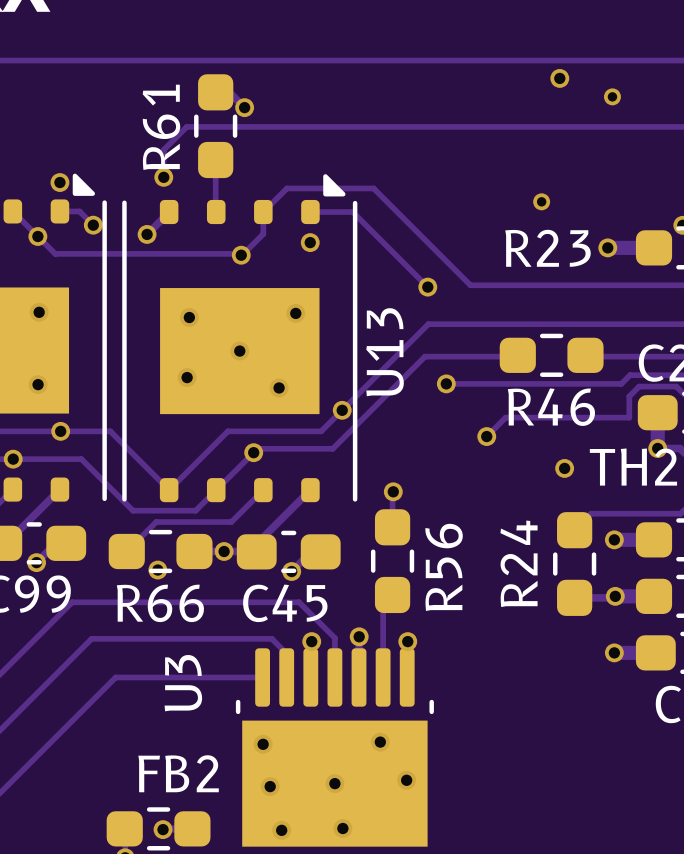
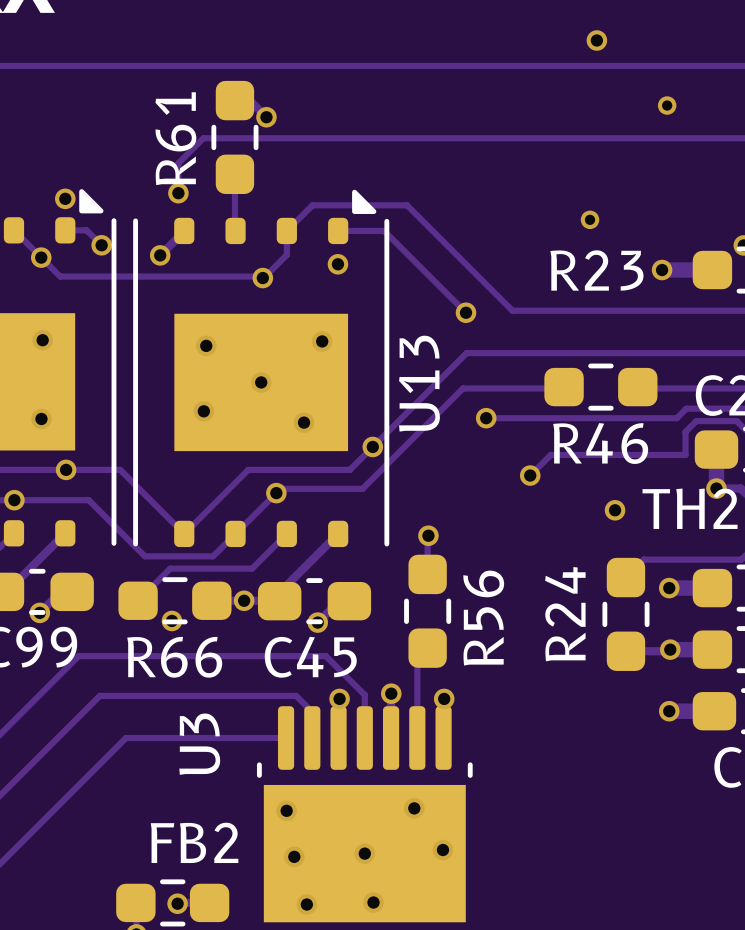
via position: (559, 78) -> (596, 40)

